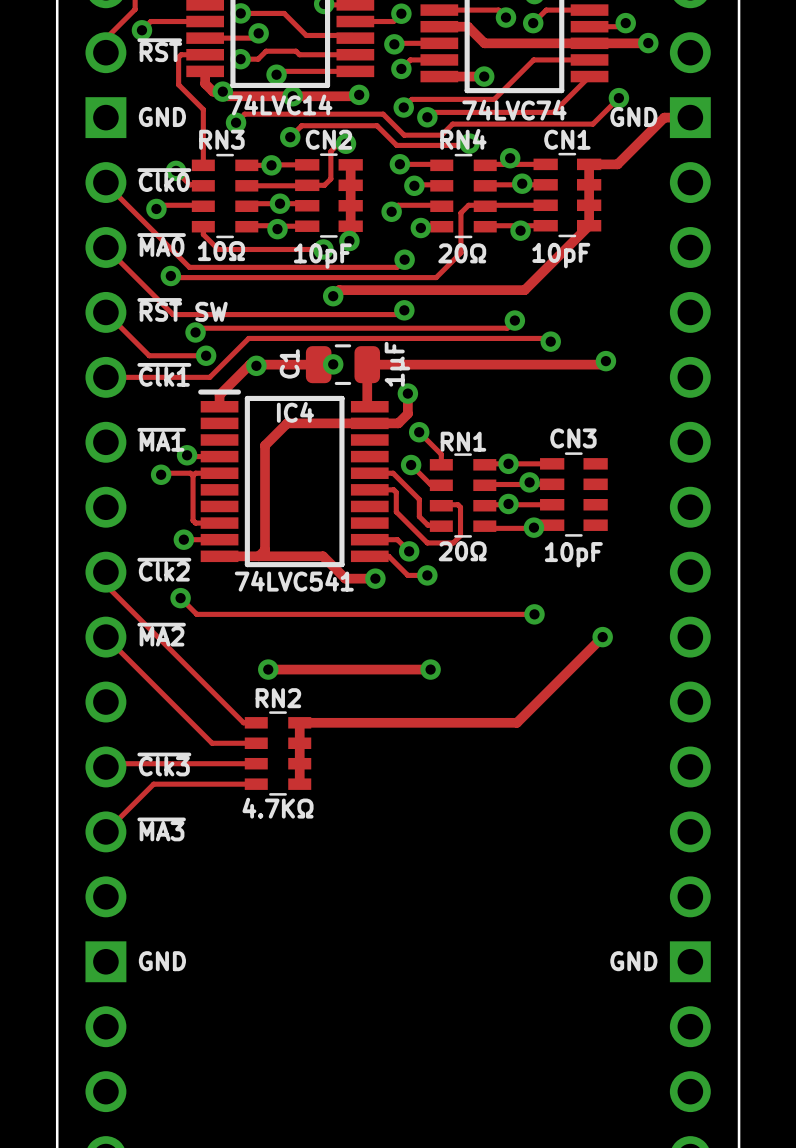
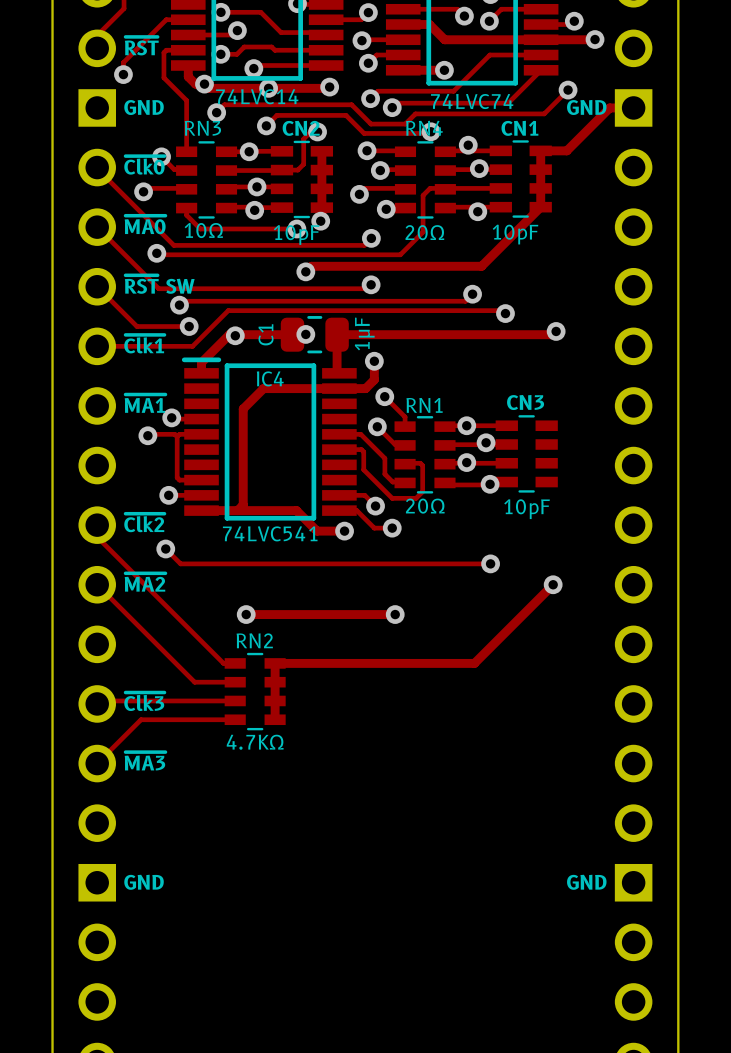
track: (181, 21) (150, 21) (141, 30) -> (166, 19) (123, 62) (123, 74)
via: (141, 30) -> none
via: none -> (123, 74)

